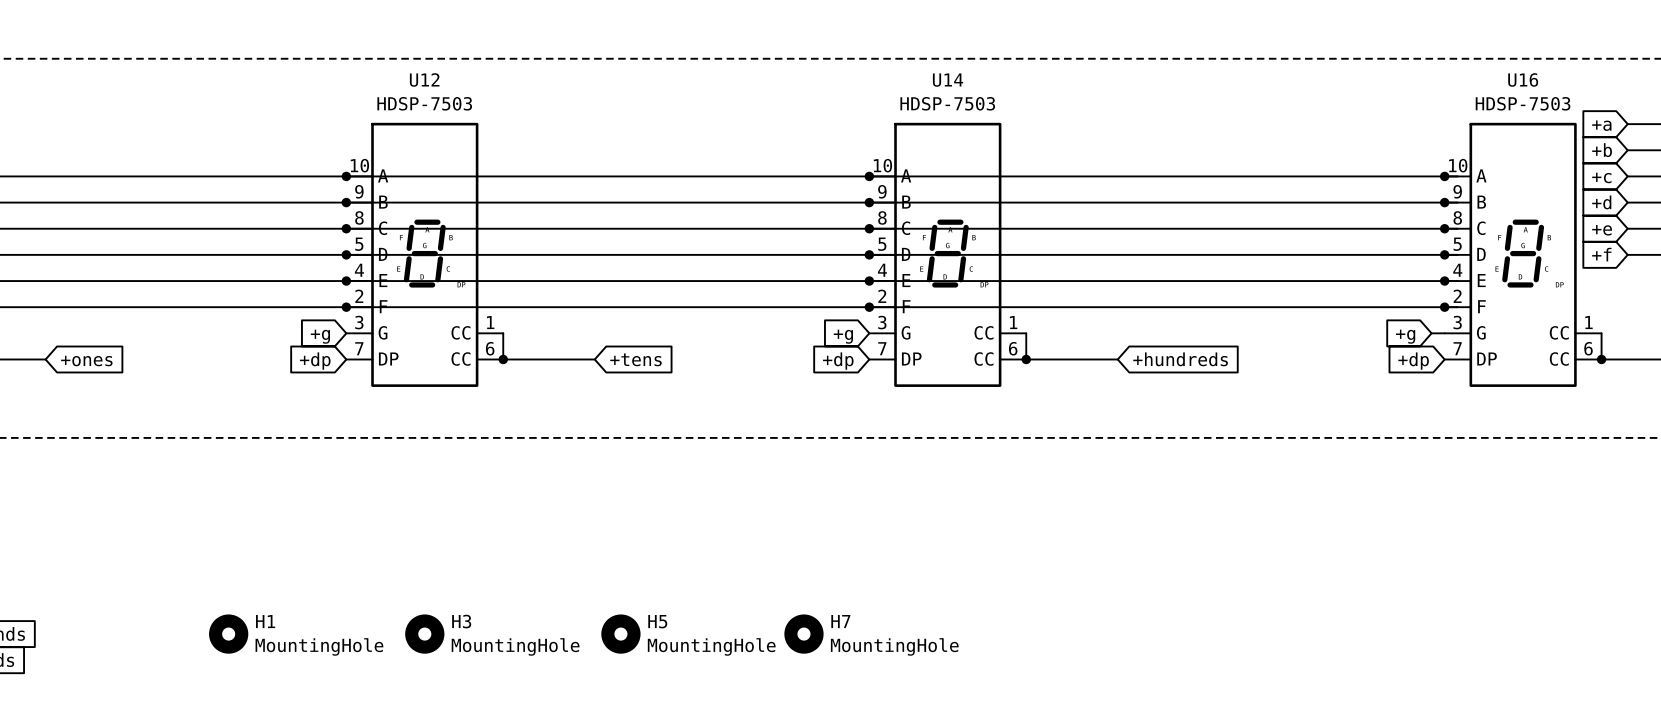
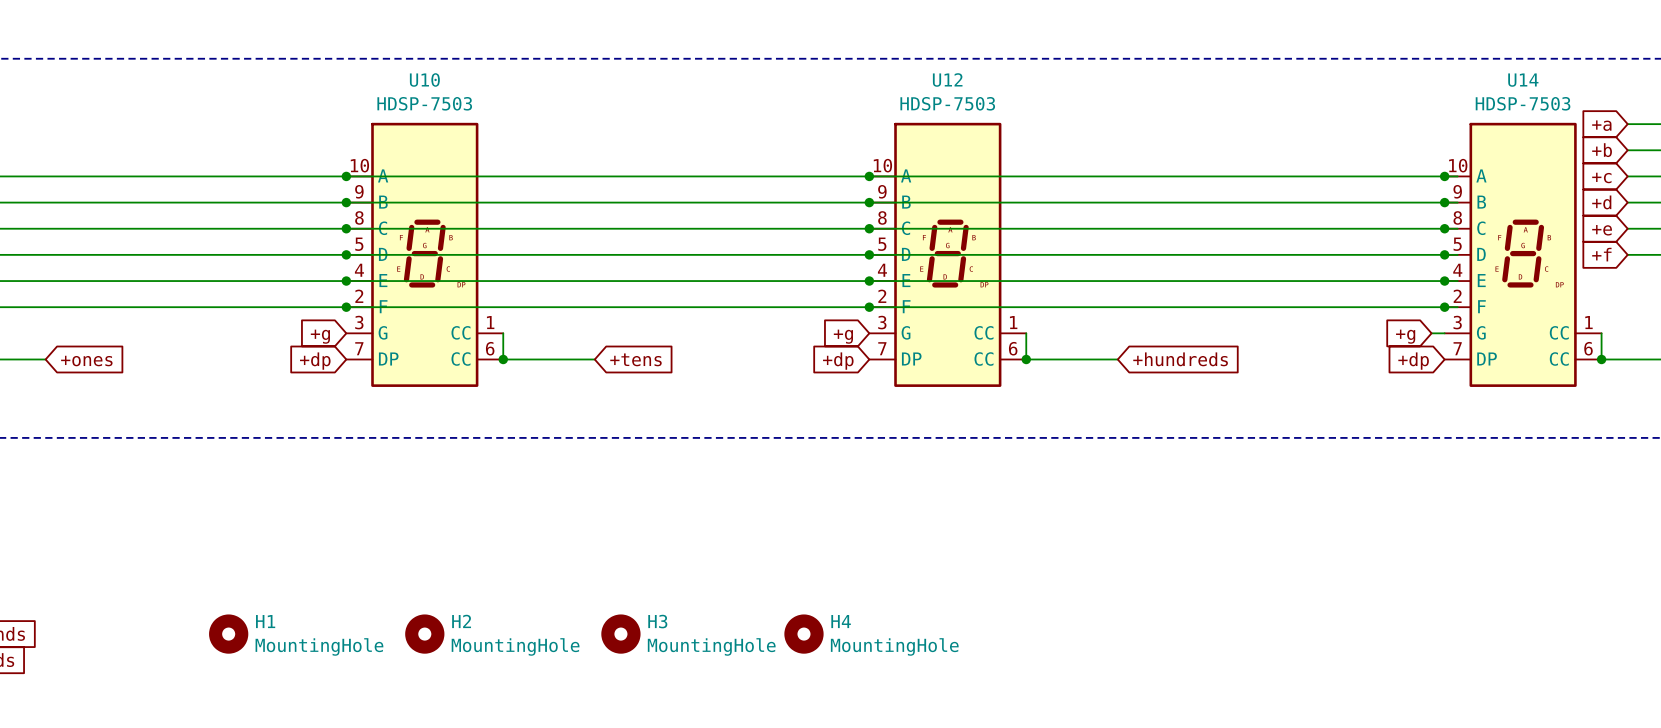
U12 name: U12 (424, 79) -> U10 (424, 79)
U16 name: U16 (1523, 79) -> U14 (1523, 80)
U14 name: U14 (948, 80) -> U12 (947, 79)
H3 name: H3 (461, 621) -> H2 (461, 621)
H5 name: H5 (657, 621) -> H3 (657, 621)
H7 name: H7 (840, 621) -> H4 (841, 621)

